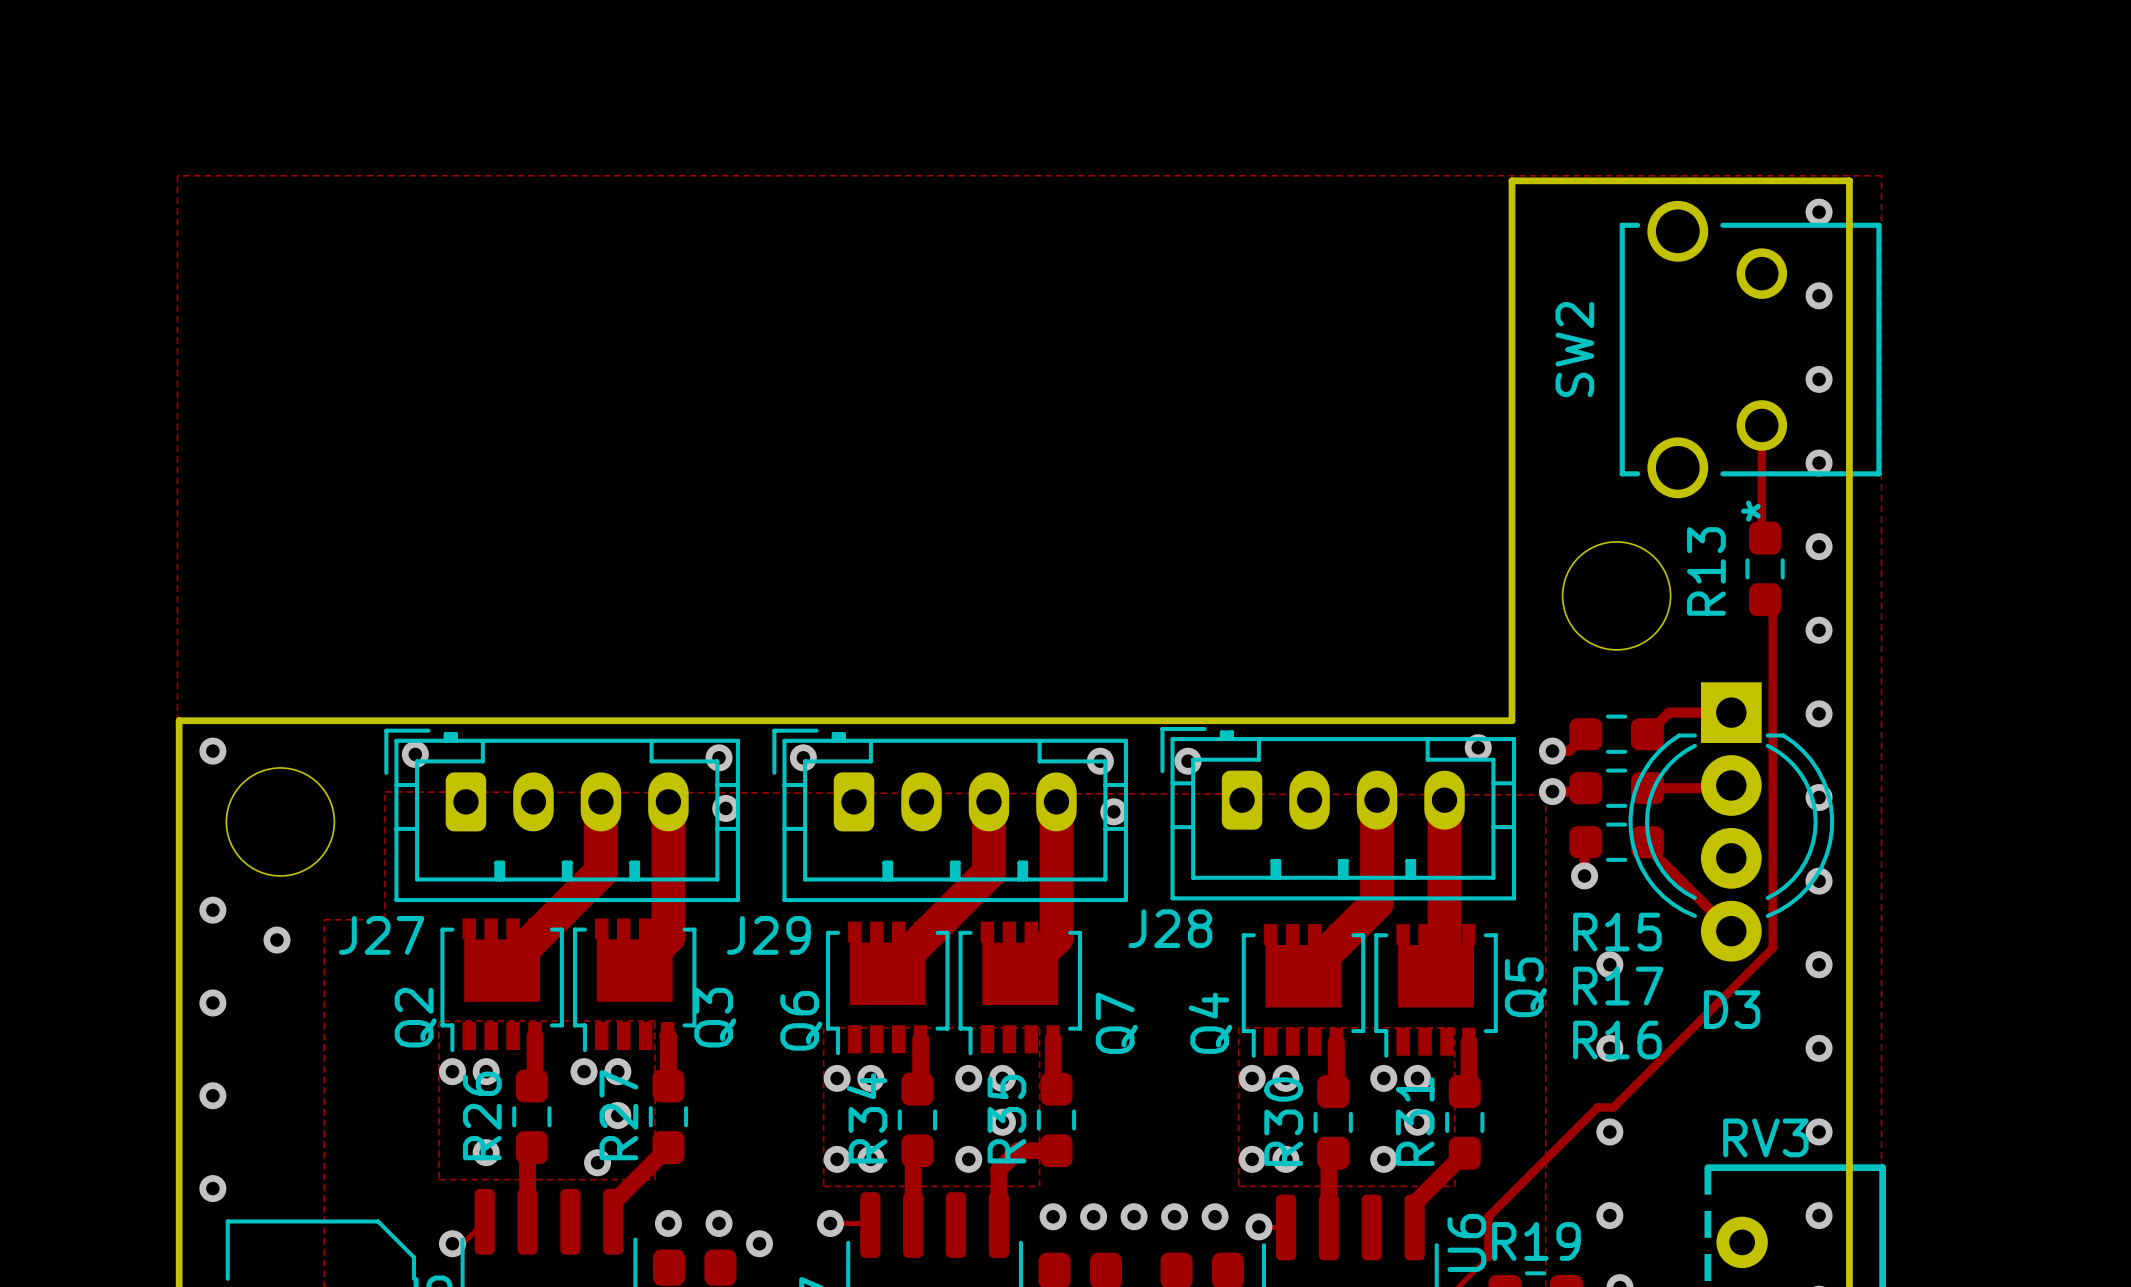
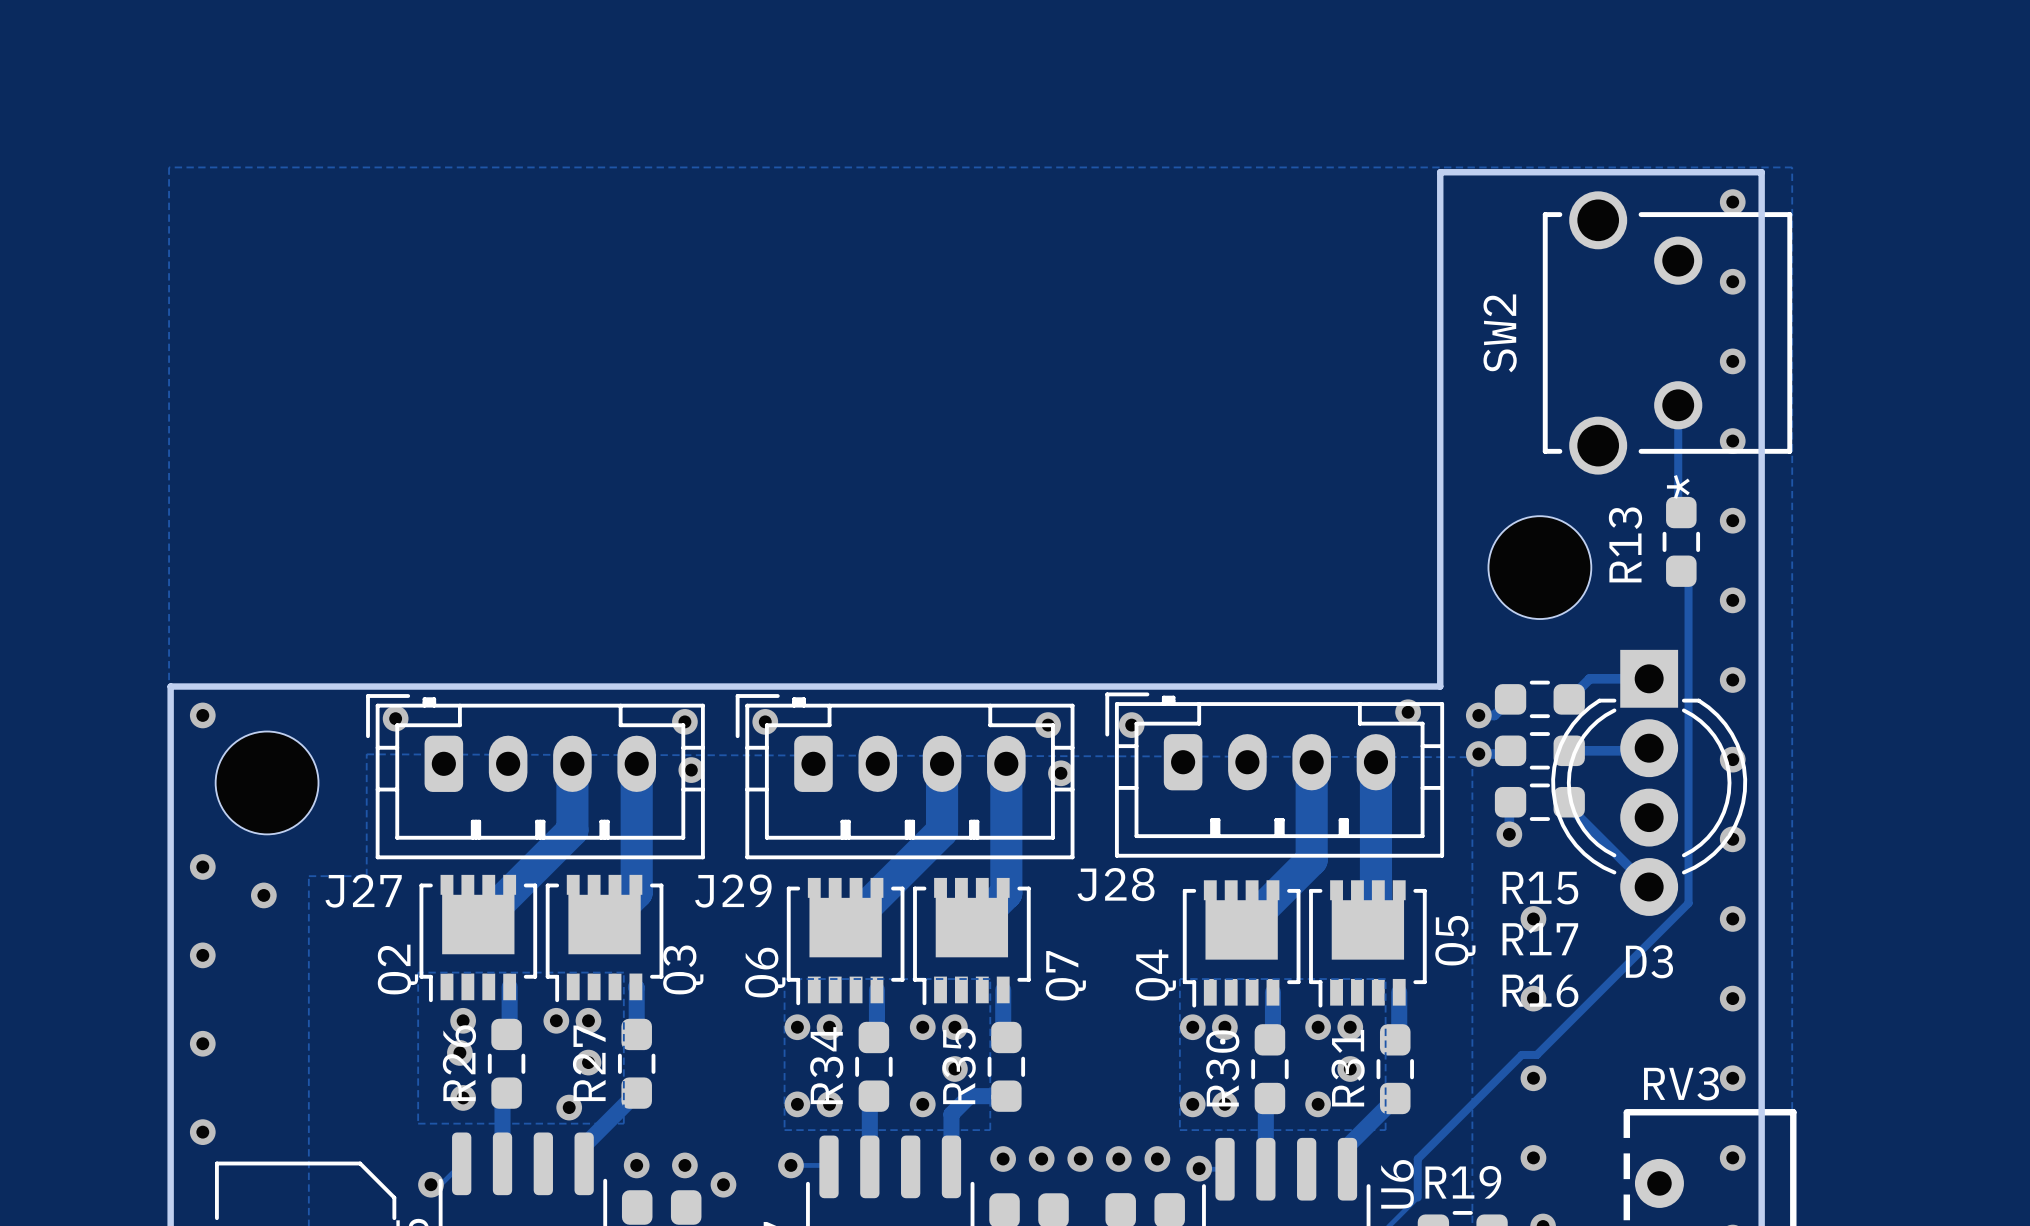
via position: (452, 1071) -> (459, 1052)

